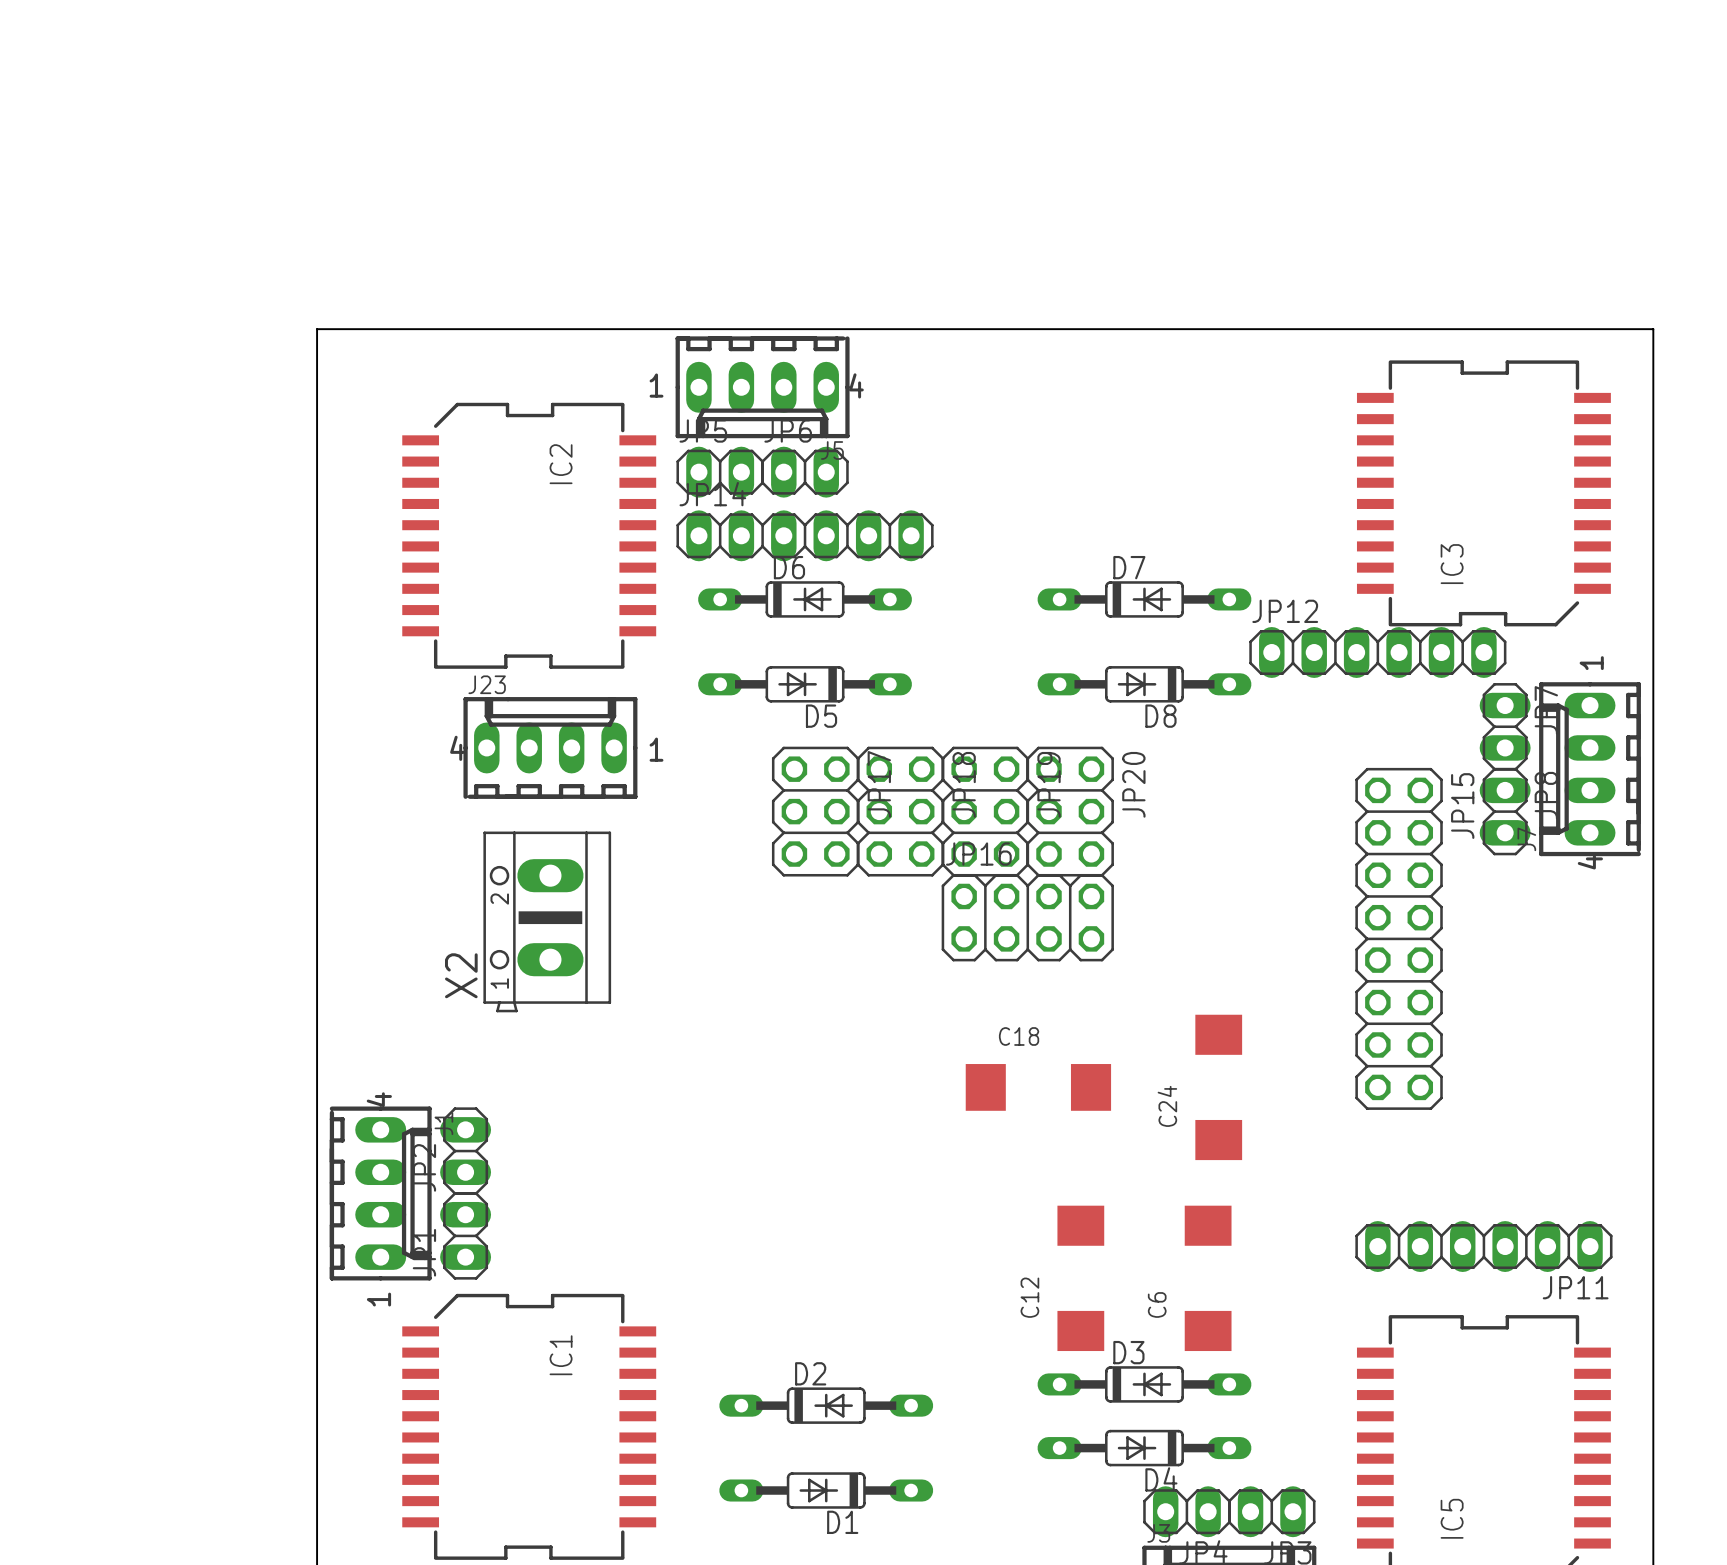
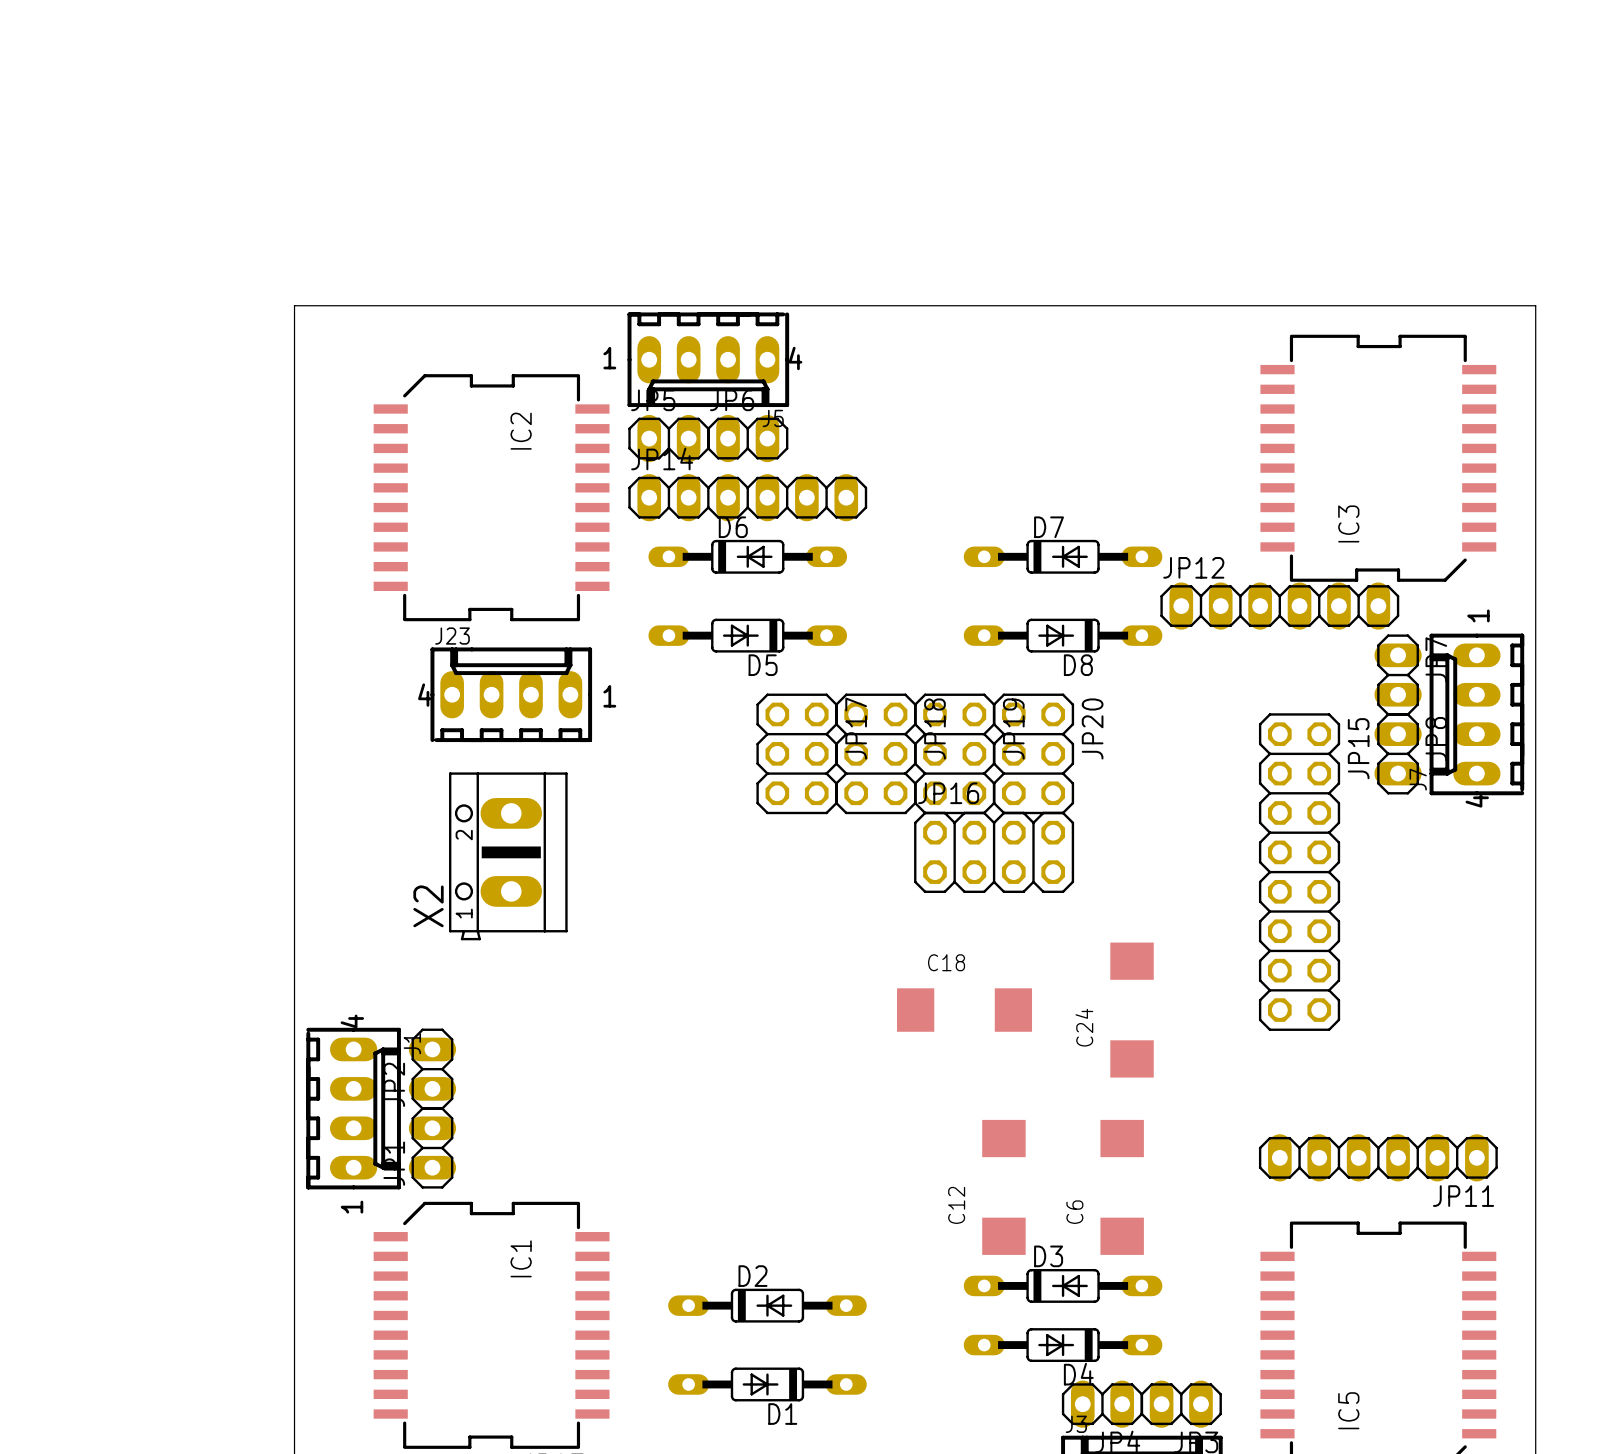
JP17 position: (815, 811) -> (797, 753)
JP18 position: (900, 811) -> (875, 753)
JP19 position: (985, 811) -> (954, 753)
JP20 position: (1070, 811) -> (1033, 753)
JP16 position: (1027, 917) -> (994, 852)

